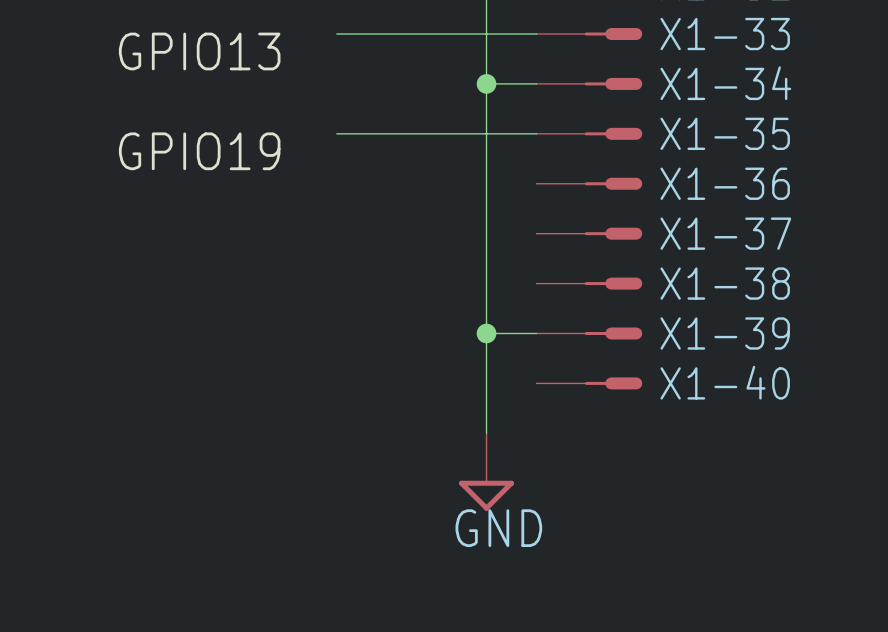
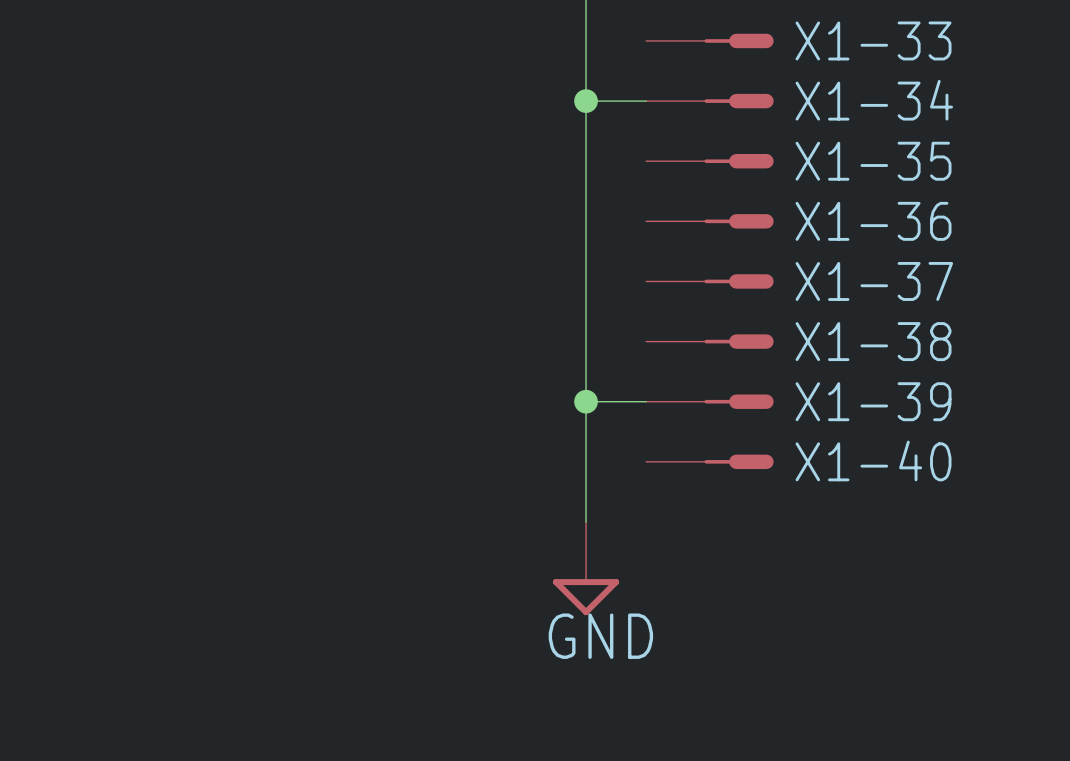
wire: (336, 34) (536, 34) -> none
label: GPIO13 (199, 51) -> none
wire: (336, 133) (536, 133) -> none
label: GPIO19 (199, 151) -> none

